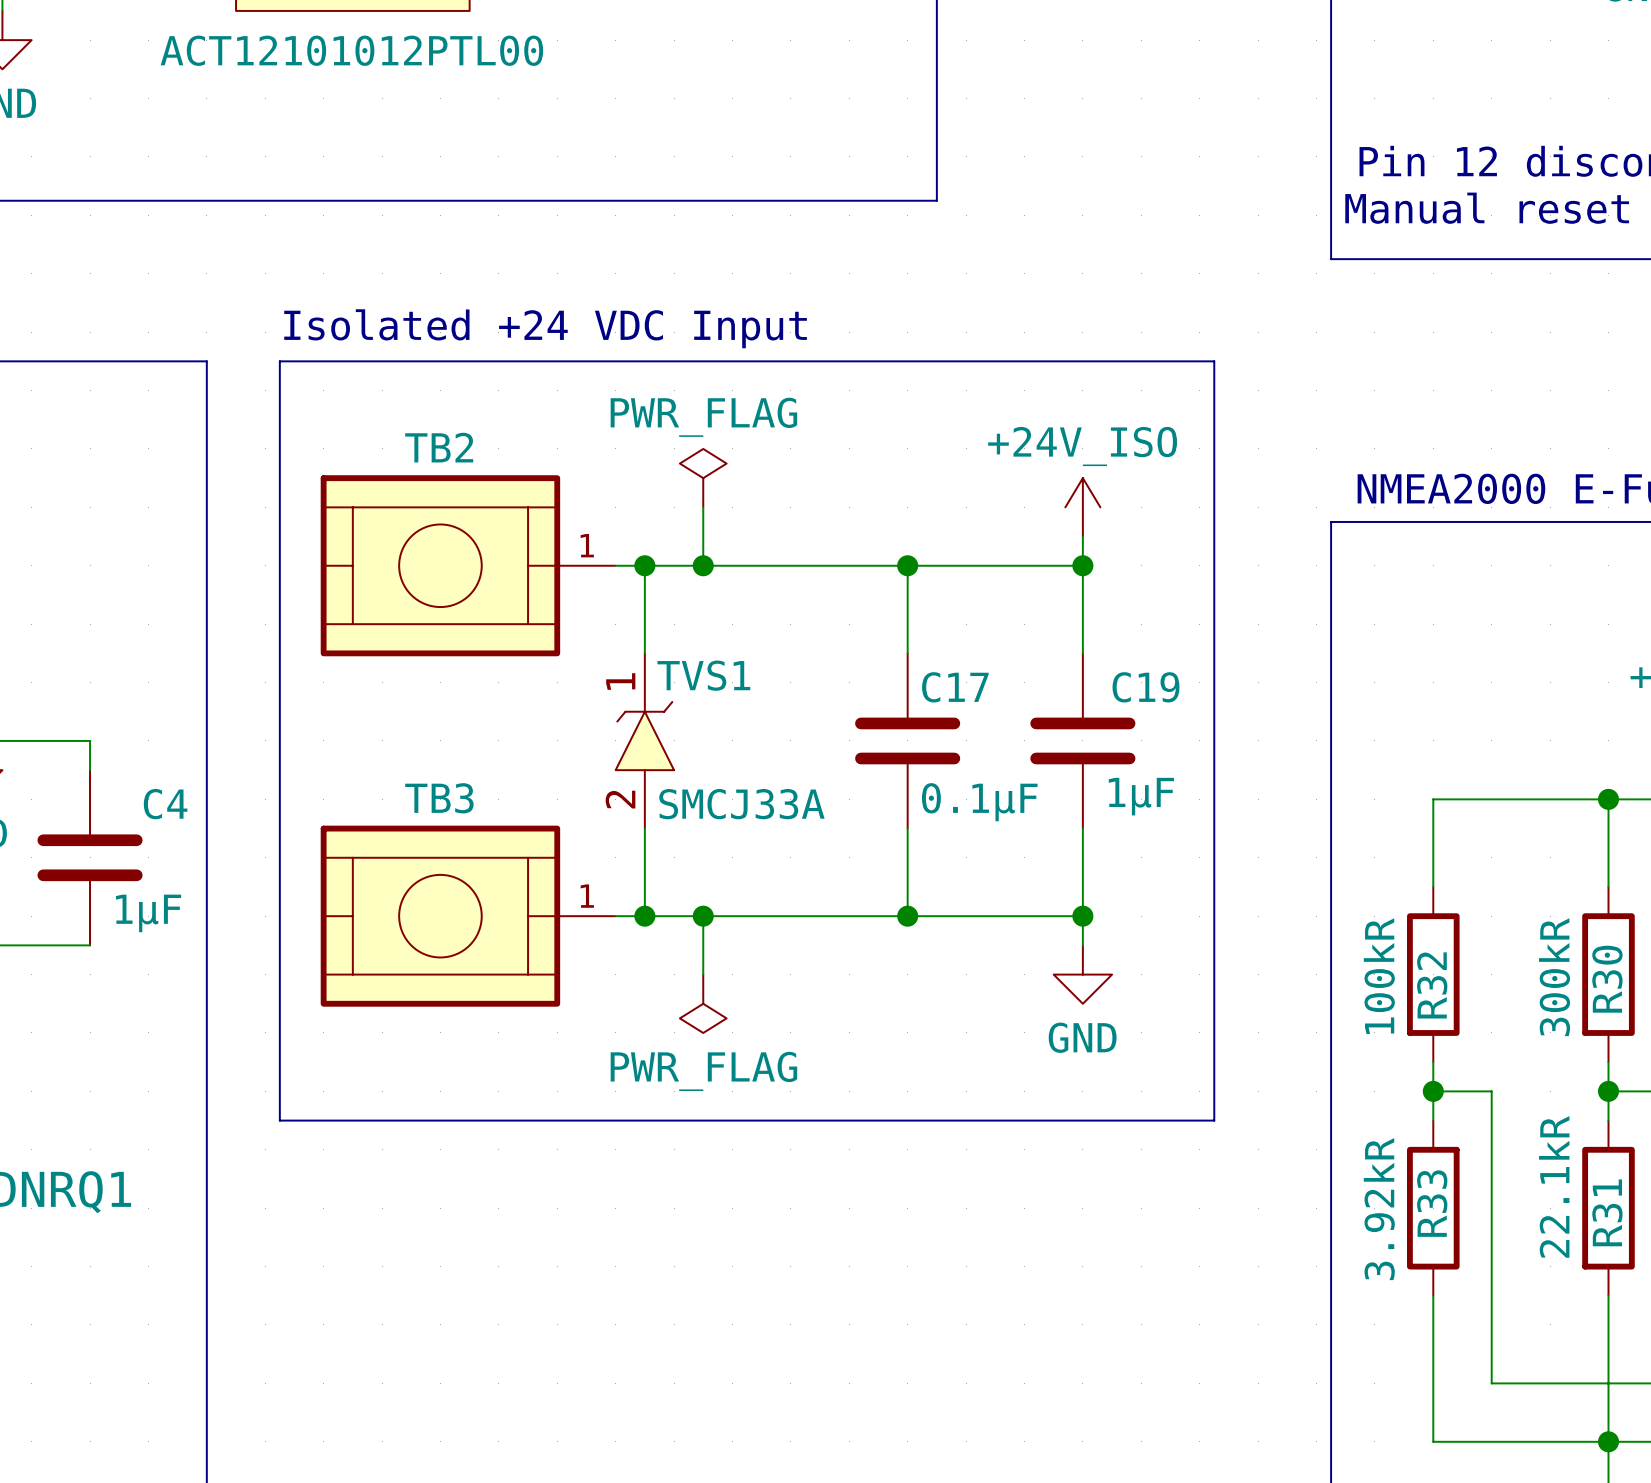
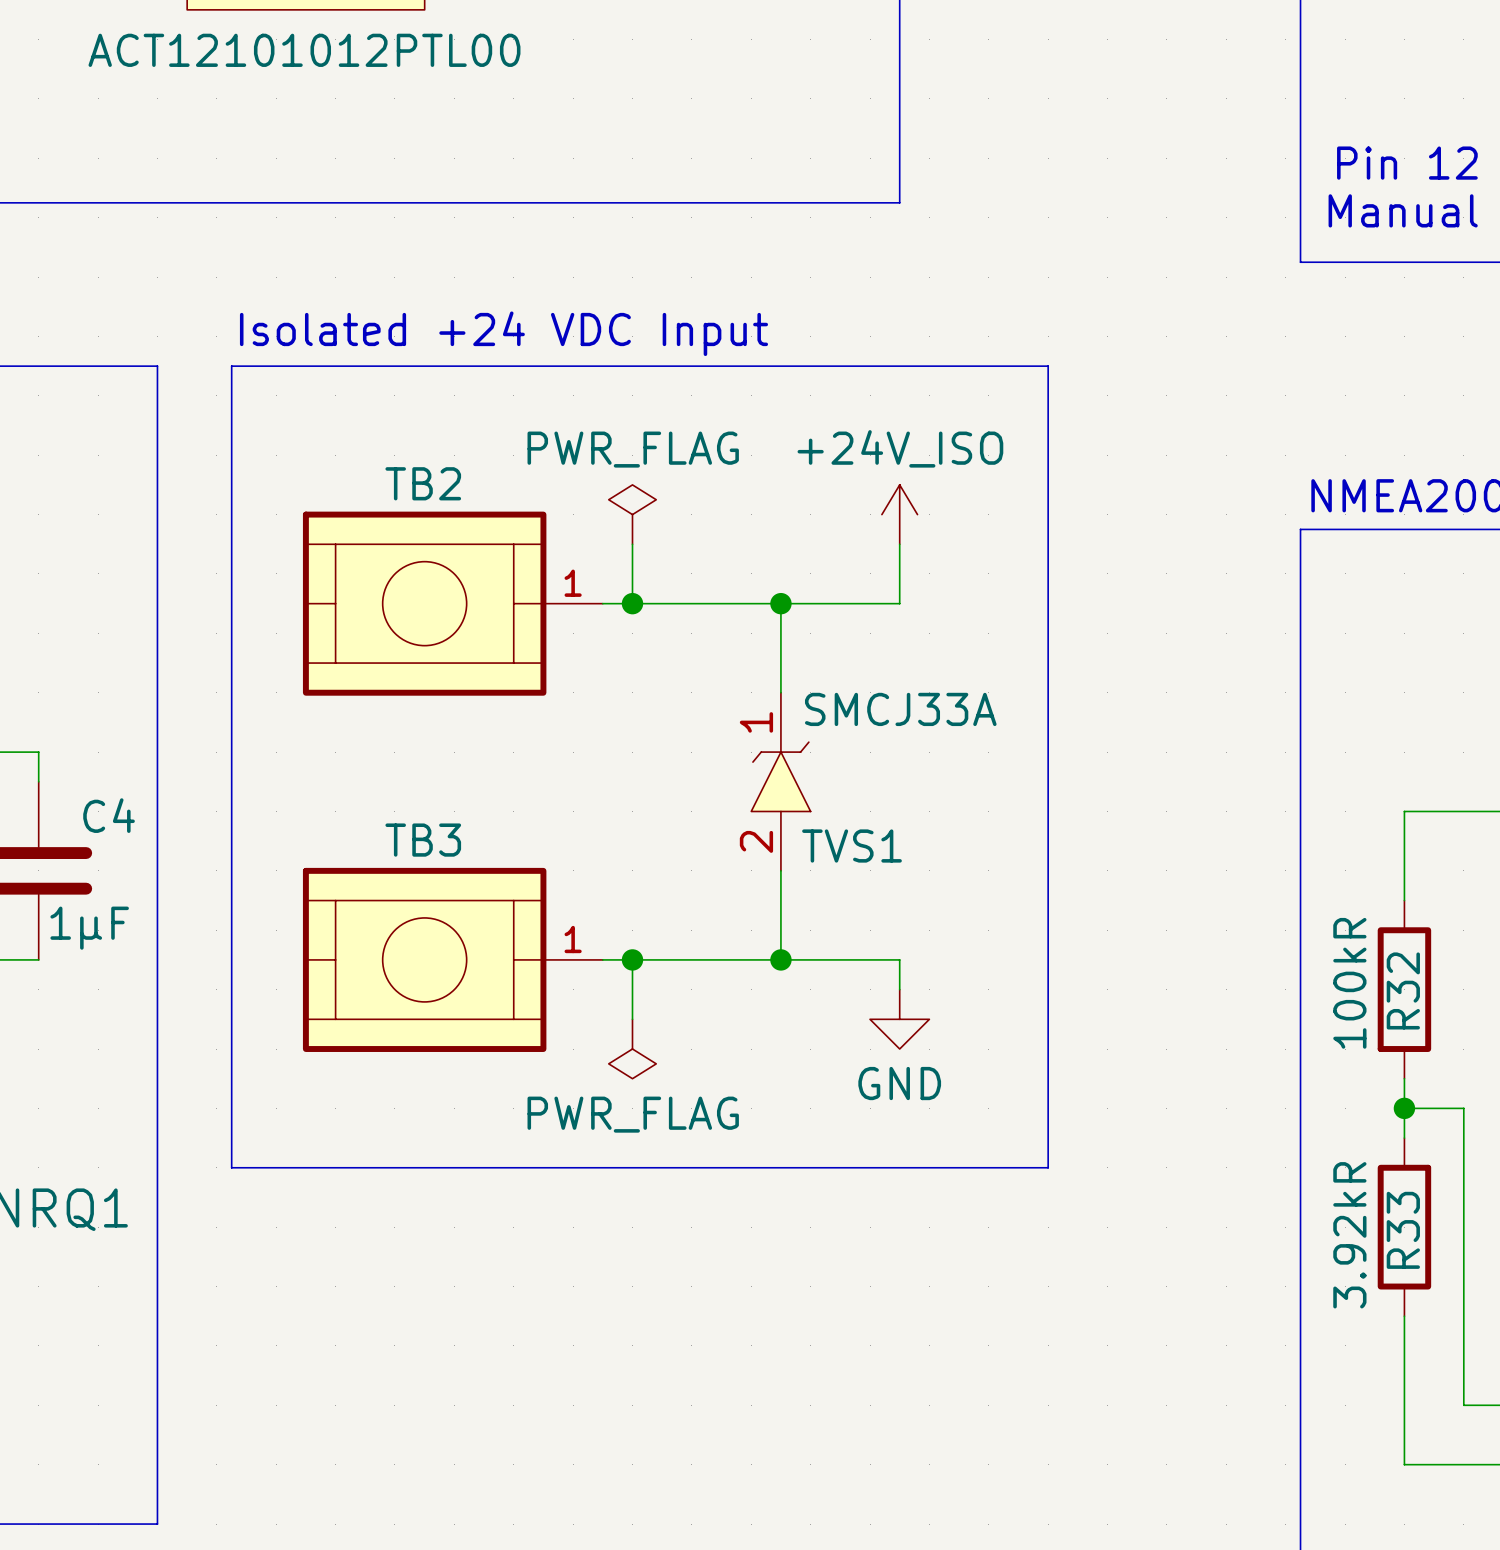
line: (1082, 361) (1214, 361) (1214, 1120) (279, 1120) -> (1048, 366) (1048, 1167) (231, 1167) (231, 1138)
power symbol position: PWR_FLAG (703, 478) -> PWR_FLAG (632, 514)
wire: (703, 507) (703, 565) -> (632, 544) (632, 603)
power symbol position: +24V_ISO (1082, 507) -> +24V_ISO (899, 514)
wire: none -> (899, 544) (899, 603) (602, 603)
TB2 position: (468, 565) -> (452, 603)
wire: (615, 565) (1082, 565) -> none
wire: (644, 565) (644, 653) -> none
junction: (644, 565) -> none
junction: (703, 565) -> none
wire: (907, 565) (907, 653) -> (780, 603) (780, 692)
junction: (907, 565) -> none
junction: (1082, 565) -> none
junction: none -> (632, 603)
junction: none -> (780, 603)
TVS1 name position: TVS1 (703, 675) -> TVS1 (852, 846)
TVS1 position: (644, 740) -> (780, 781)
C17: 0.1μF (907, 740) -> none
C19: 1μF (1082, 740) -> none
TVS1 value position: SMCJ33A (741, 804) -> SMCJ33A (900, 709)
wire: (644, 828) (644, 916) -> none
wire: (907, 828) (907, 916) -> (780, 870) (780, 959)
TB3 position: (468, 916) -> (452, 959)
wire: (615, 916) (1082, 916) -> none
junction: (644, 916) -> none
wire: (703, 916) (703, 974) -> (632, 959) (632, 1019)
junction: (703, 916) -> none
junction: (907, 916) -> none
junction: (1082, 916) -> none
wire: none -> (602, 959) (899, 959) (899, 989)
junction: none -> (632, 959)
junction: none -> (780, 959)
power symbol position: GND (1082, 974) -> GND (899, 1019)
power symbol position: PWR_FLAG (703, 1003) -> PWR_FLAG (632, 1049)

